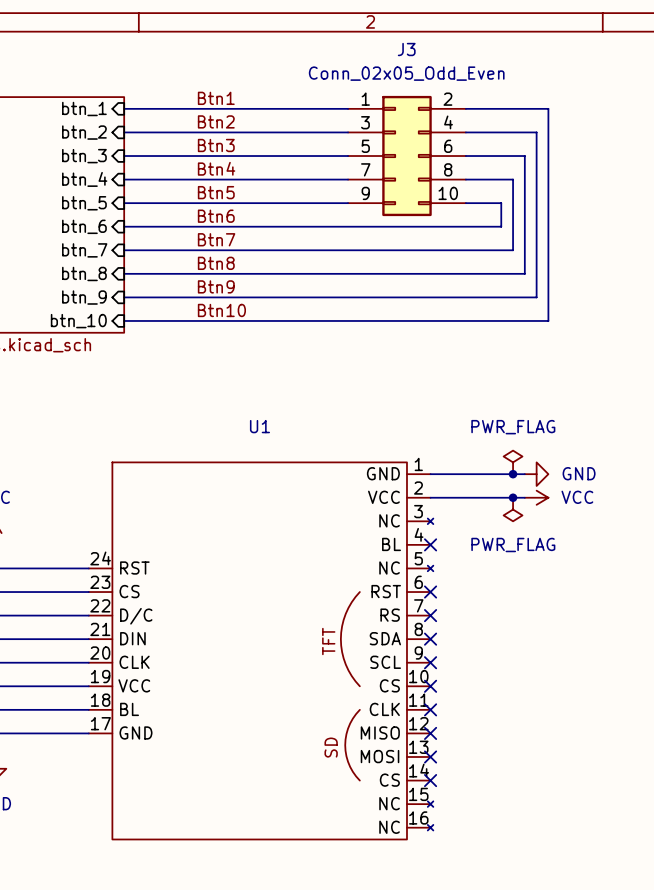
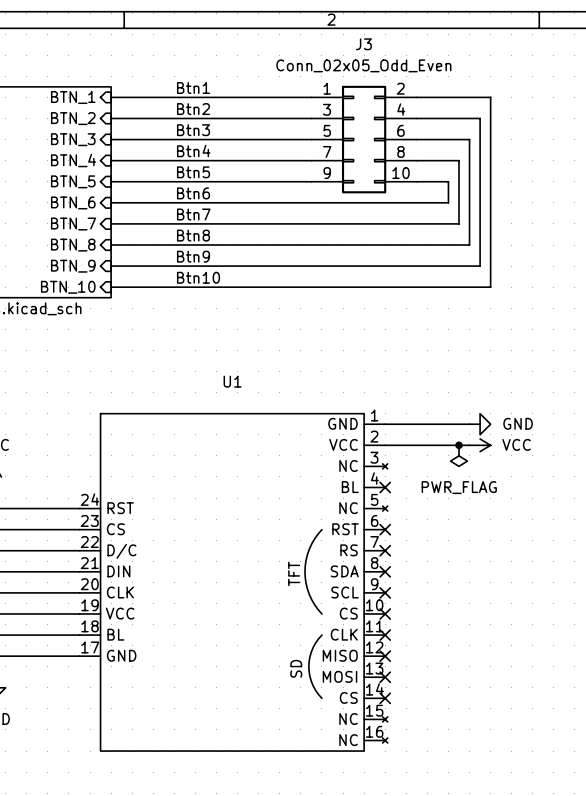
sheet pin: btn_1 (84, 108) -> BTN_1 (73, 97)
sheet pin: btn_2 (84, 132) -> BTN_2 (73, 118)
sheet pin: btn_3 (84, 156) -> BTN_3 (73, 139)
sheet pin: btn_4 (84, 179) -> BTN_4 (73, 160)
sheet pin: btn_5 (84, 203) -> BTN_5 (73, 181)
sheet pin: btn_6 (84, 226) -> BTN_6 (73, 202)
sheet pin: btn_7 (84, 250) -> BTN_7 (73, 224)
sheet pin: btn_8 (84, 273) -> BTN_8 (73, 245)
sheet pin: btn_9 (84, 297) -> BTN_9 (73, 266)
sheet pin: btn_10 (78, 321) -> BTN_10 (68, 287)
power symbol: PWR_FLAG (513, 462) -> none
junction: (513, 474) -> none

